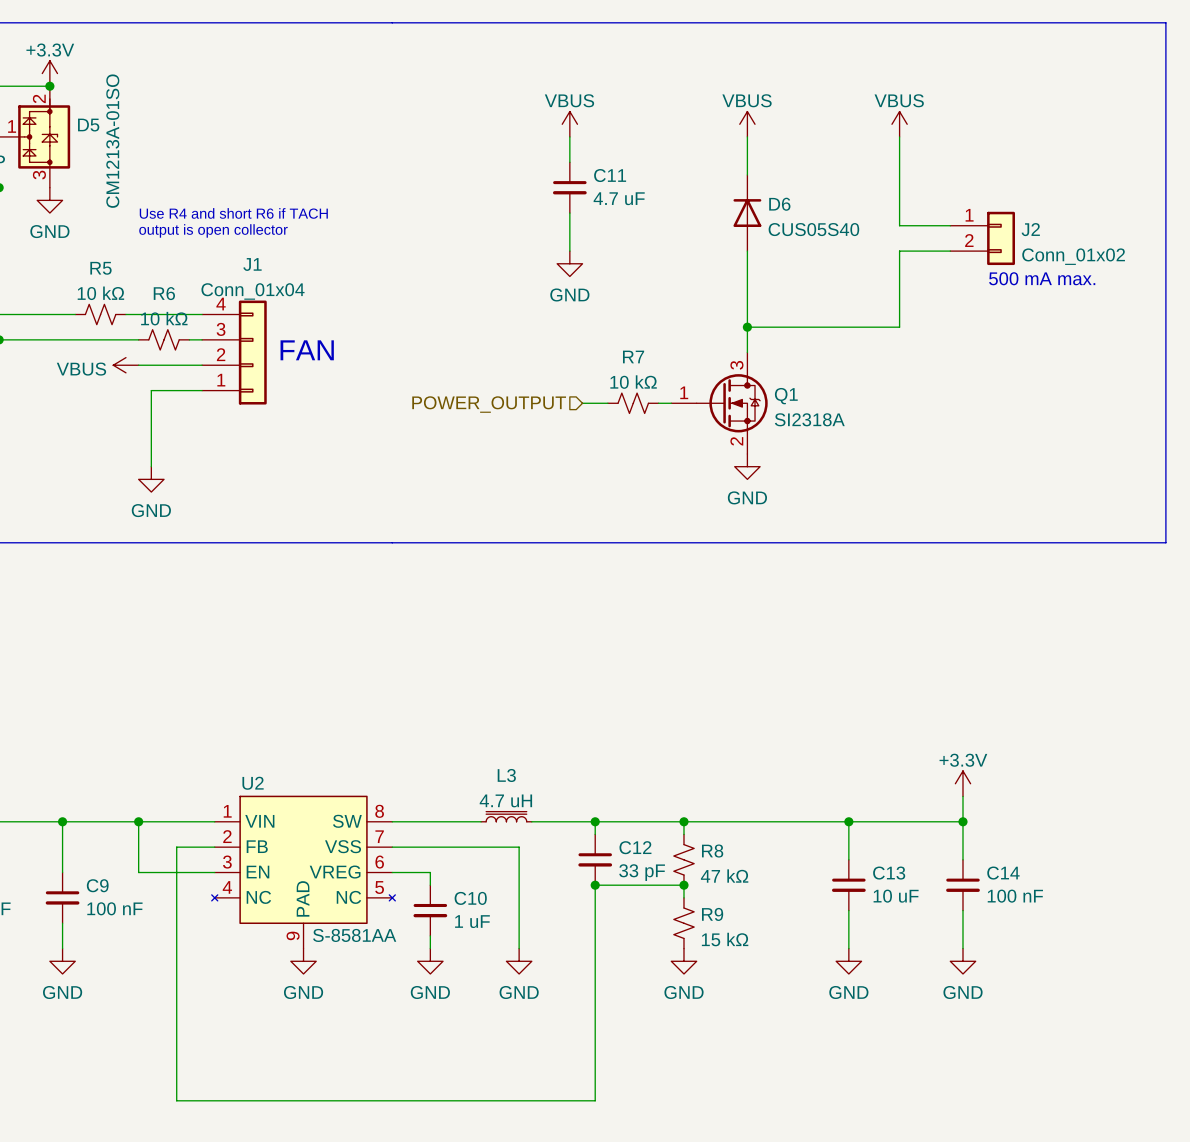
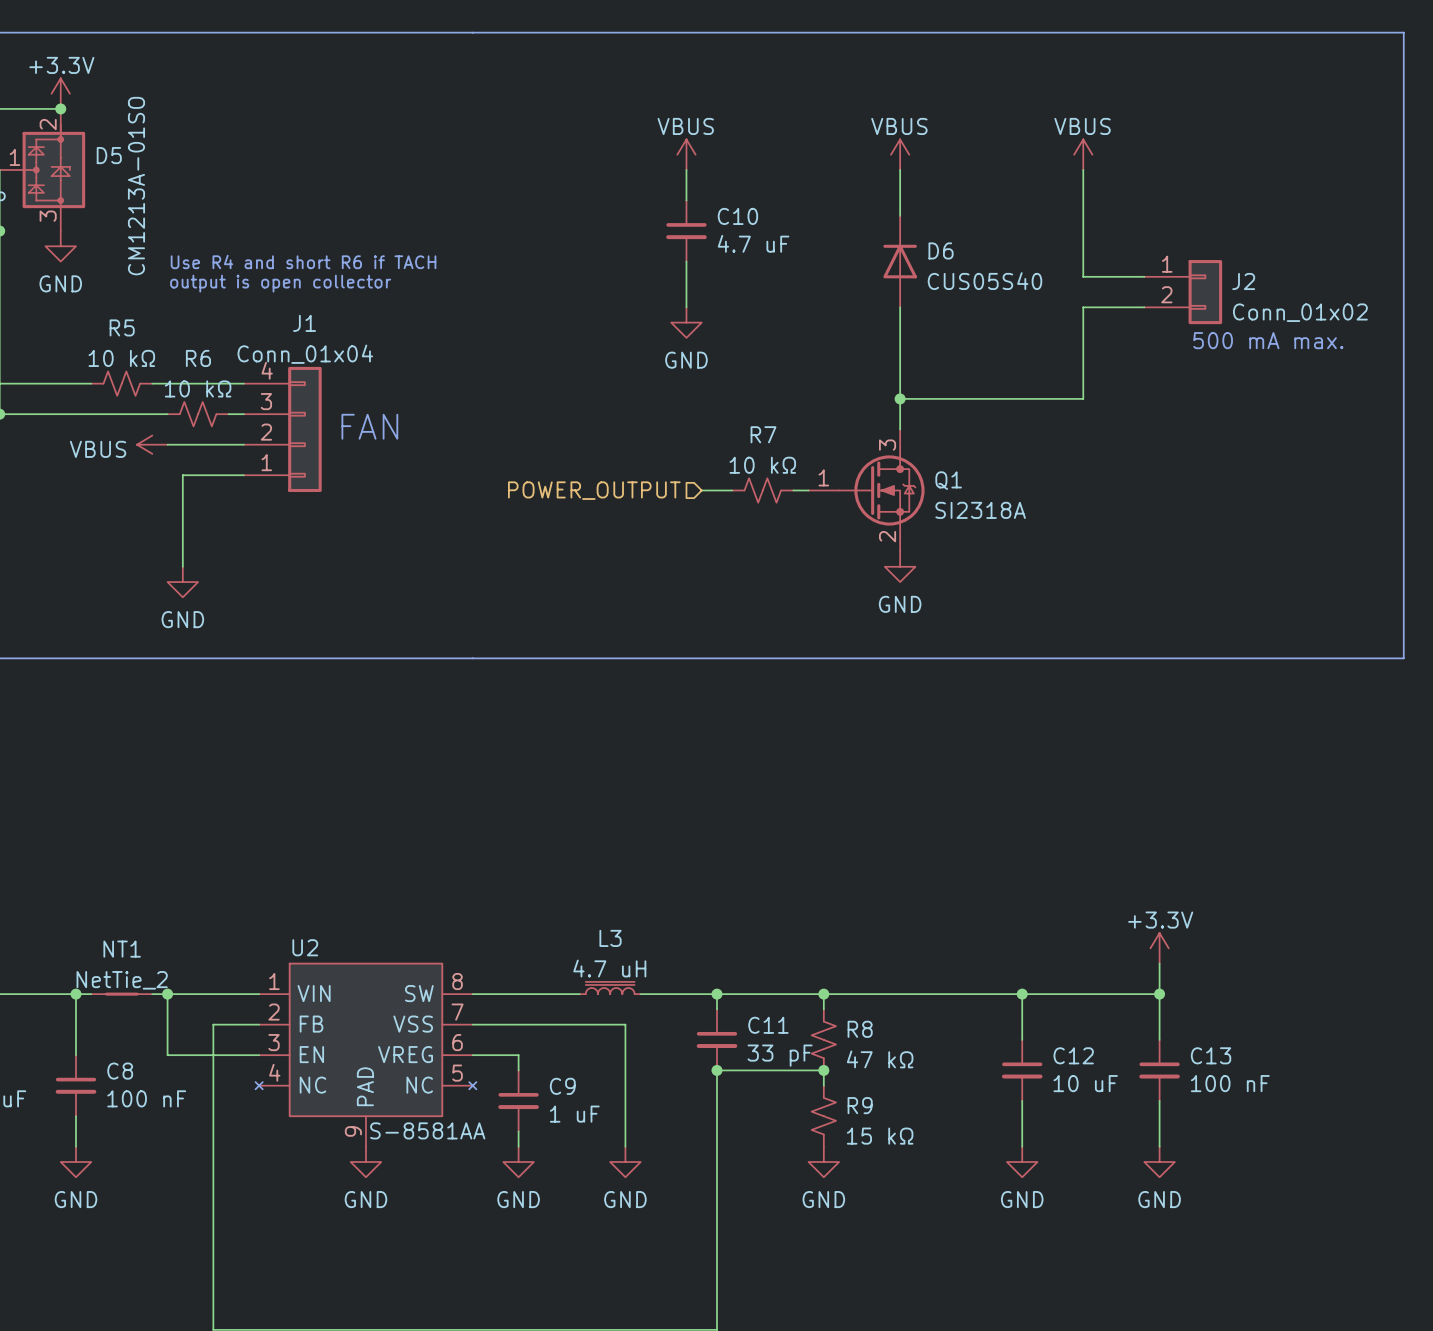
C11 name: C11 (610, 175) -> C10 (737, 216)
NT1: none -> NetTie_2 (121, 994)
C12 name: C12 (635, 847) -> C11 (768, 1025)
C13 name: C13 (889, 873) -> C12 (1073, 1055)
C14 name: C14 (1003, 873) -> C13 (1211, 1055)
C9 name: C9 (97, 885) -> C8 (120, 1071)
C10 name: C10 (470, 898) -> C9 (562, 1086)

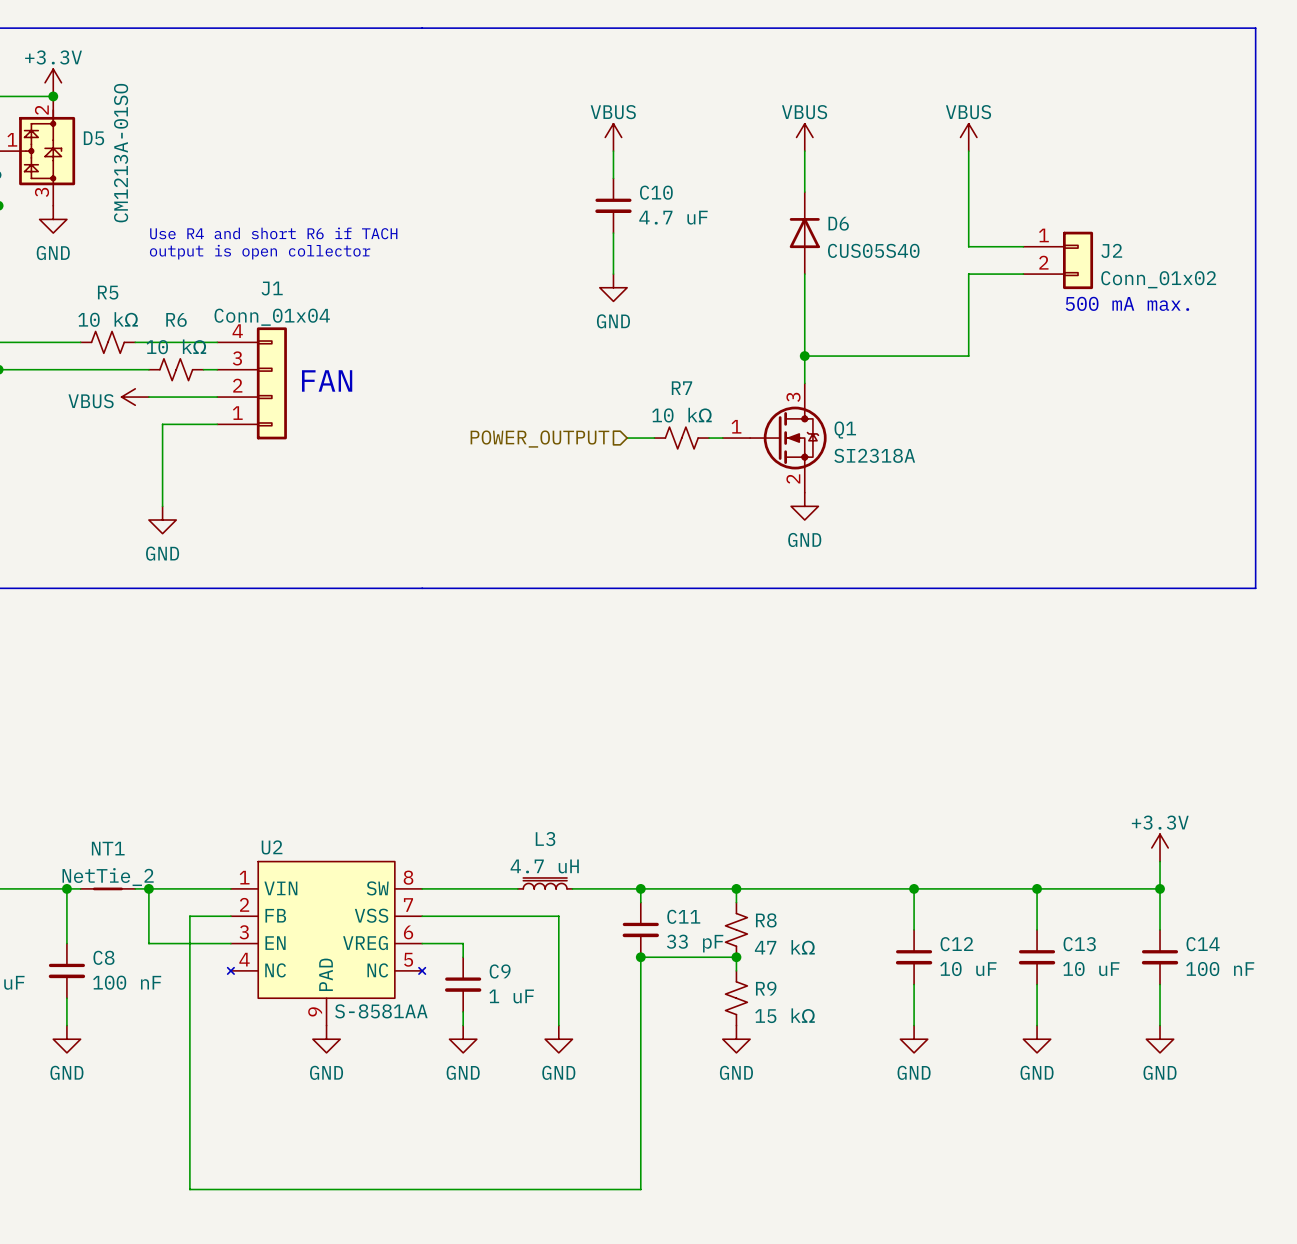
power symbol position: +3.3V (1159, 948) -> +3.3V (1160, 847)
wire: (1159, 963) (1159, 994) -> (1160, 888) (1037, 888)
wire: none -> (1160, 861) (1160, 929)
junction: none -> (1160, 888)
C14: none -> 100 nF (1160, 957)
C13 value: 100 nF (1230, 1083) -> 10 uF (1091, 969)
wire: none -> (1160, 984) (1160, 1025)
power symbol: none -> GND (1160, 1039)

